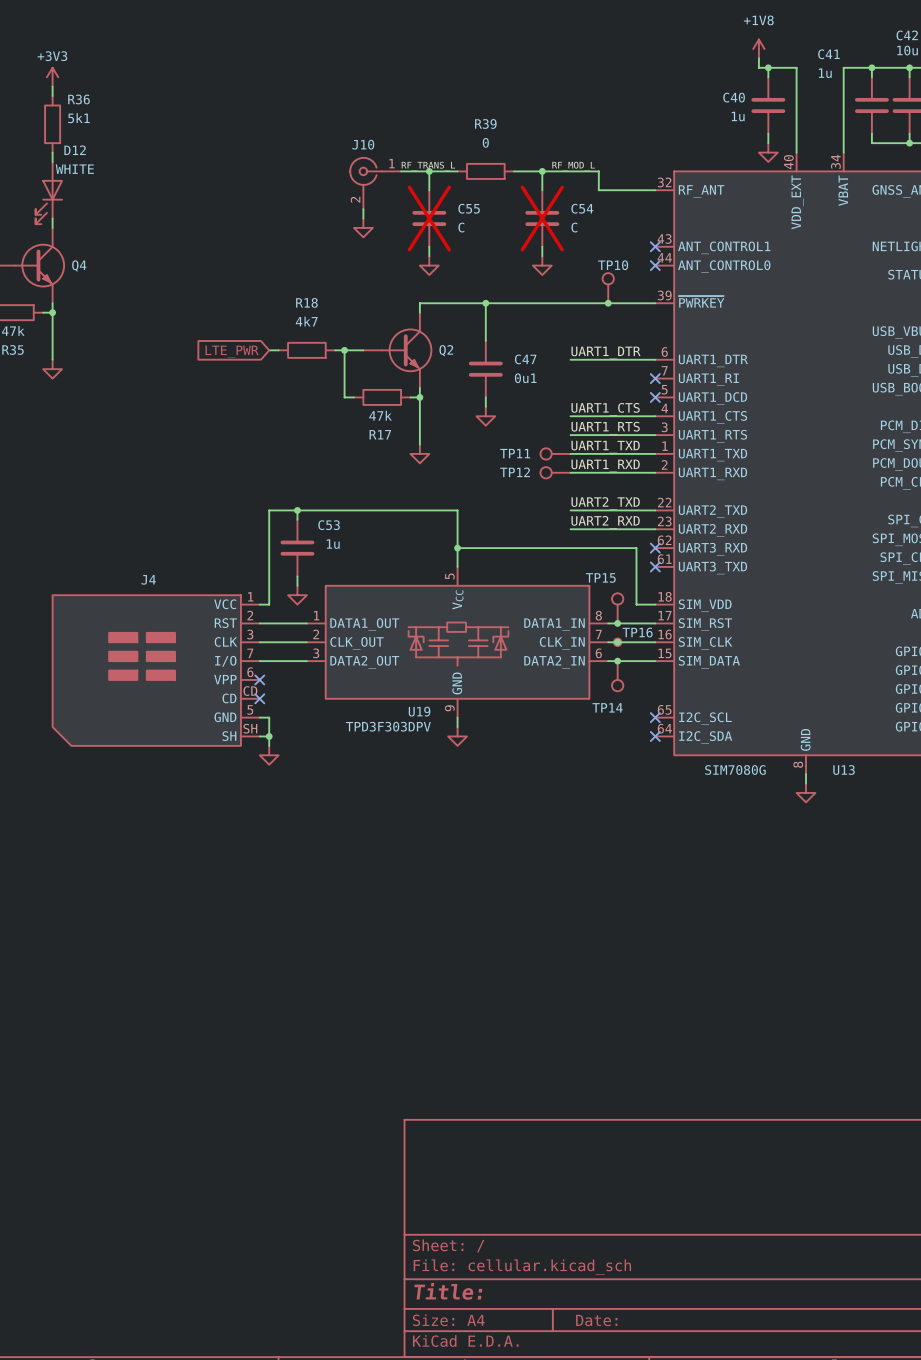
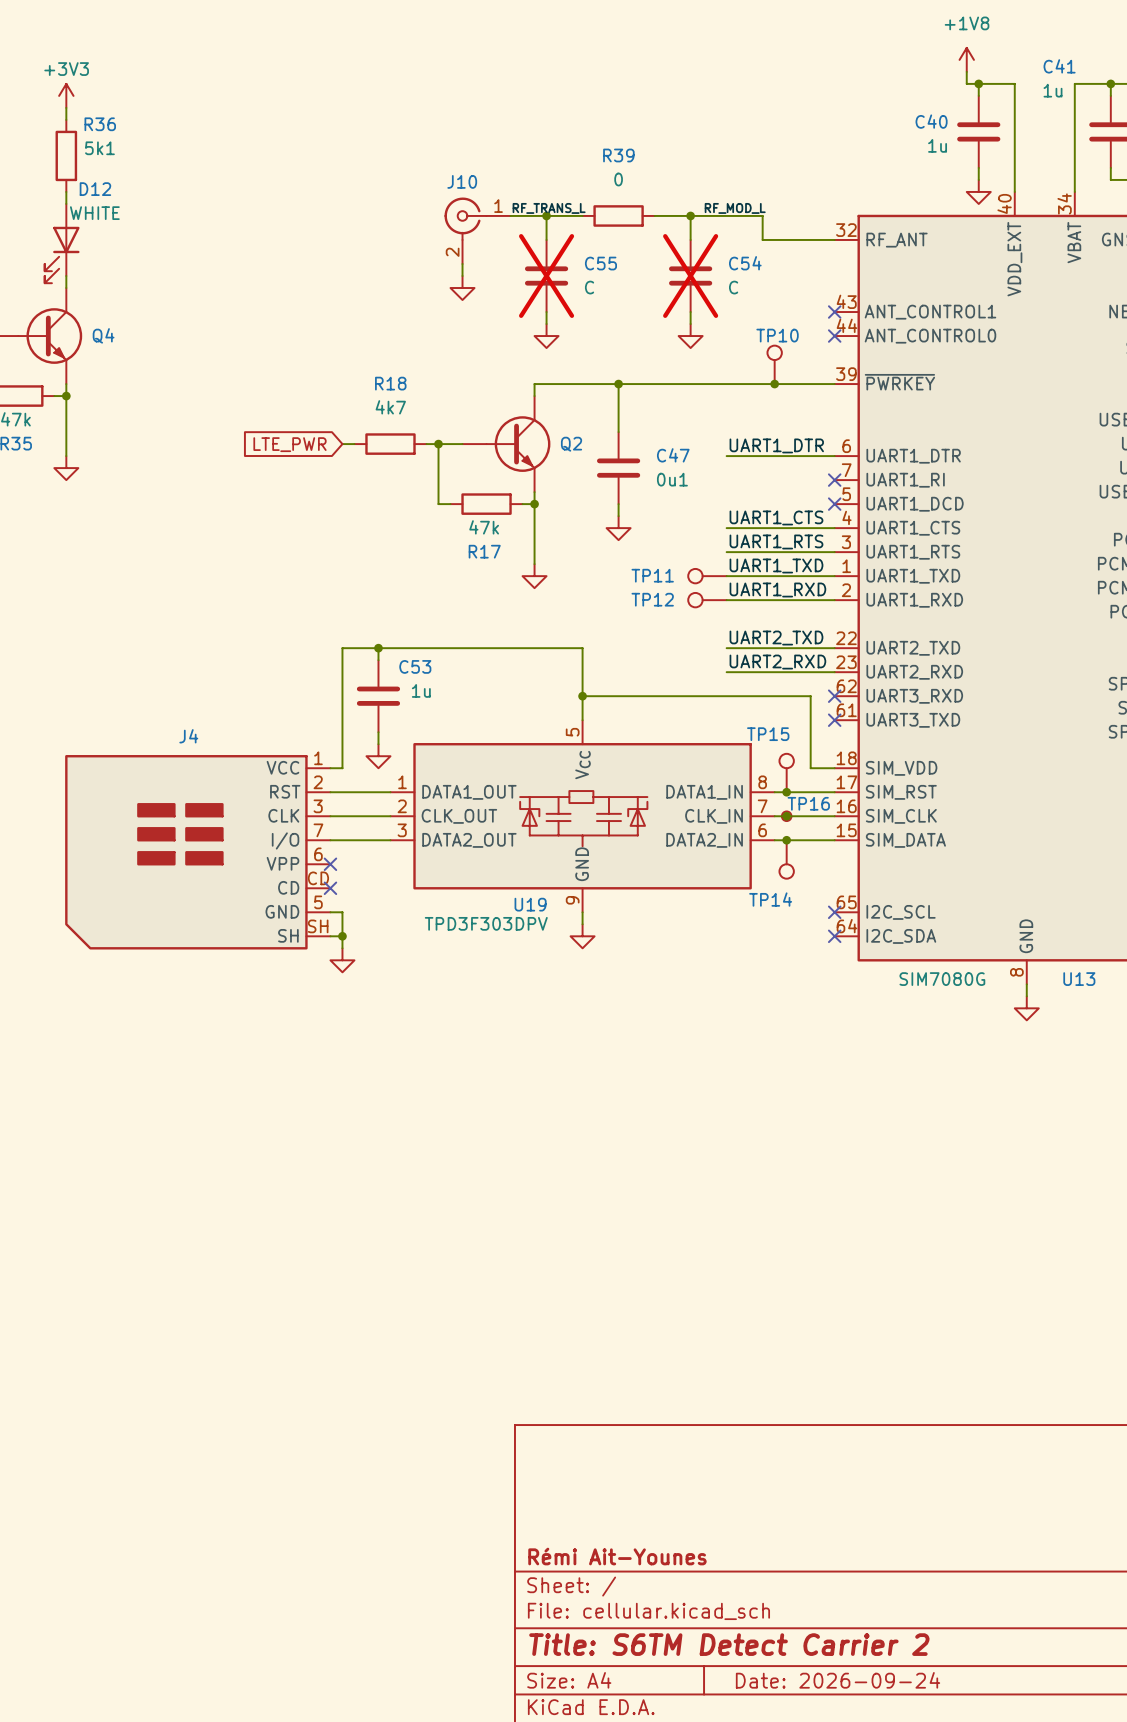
title block: none -> Rémi Ait-Younes (617, 1556)
title block: Title: (448, 1291) -> Title: S6TM Detect Carrier 2 (729, 1644)
title block: Date: (596, 1320) -> Date: 2026-09-24 (838, 1680)

